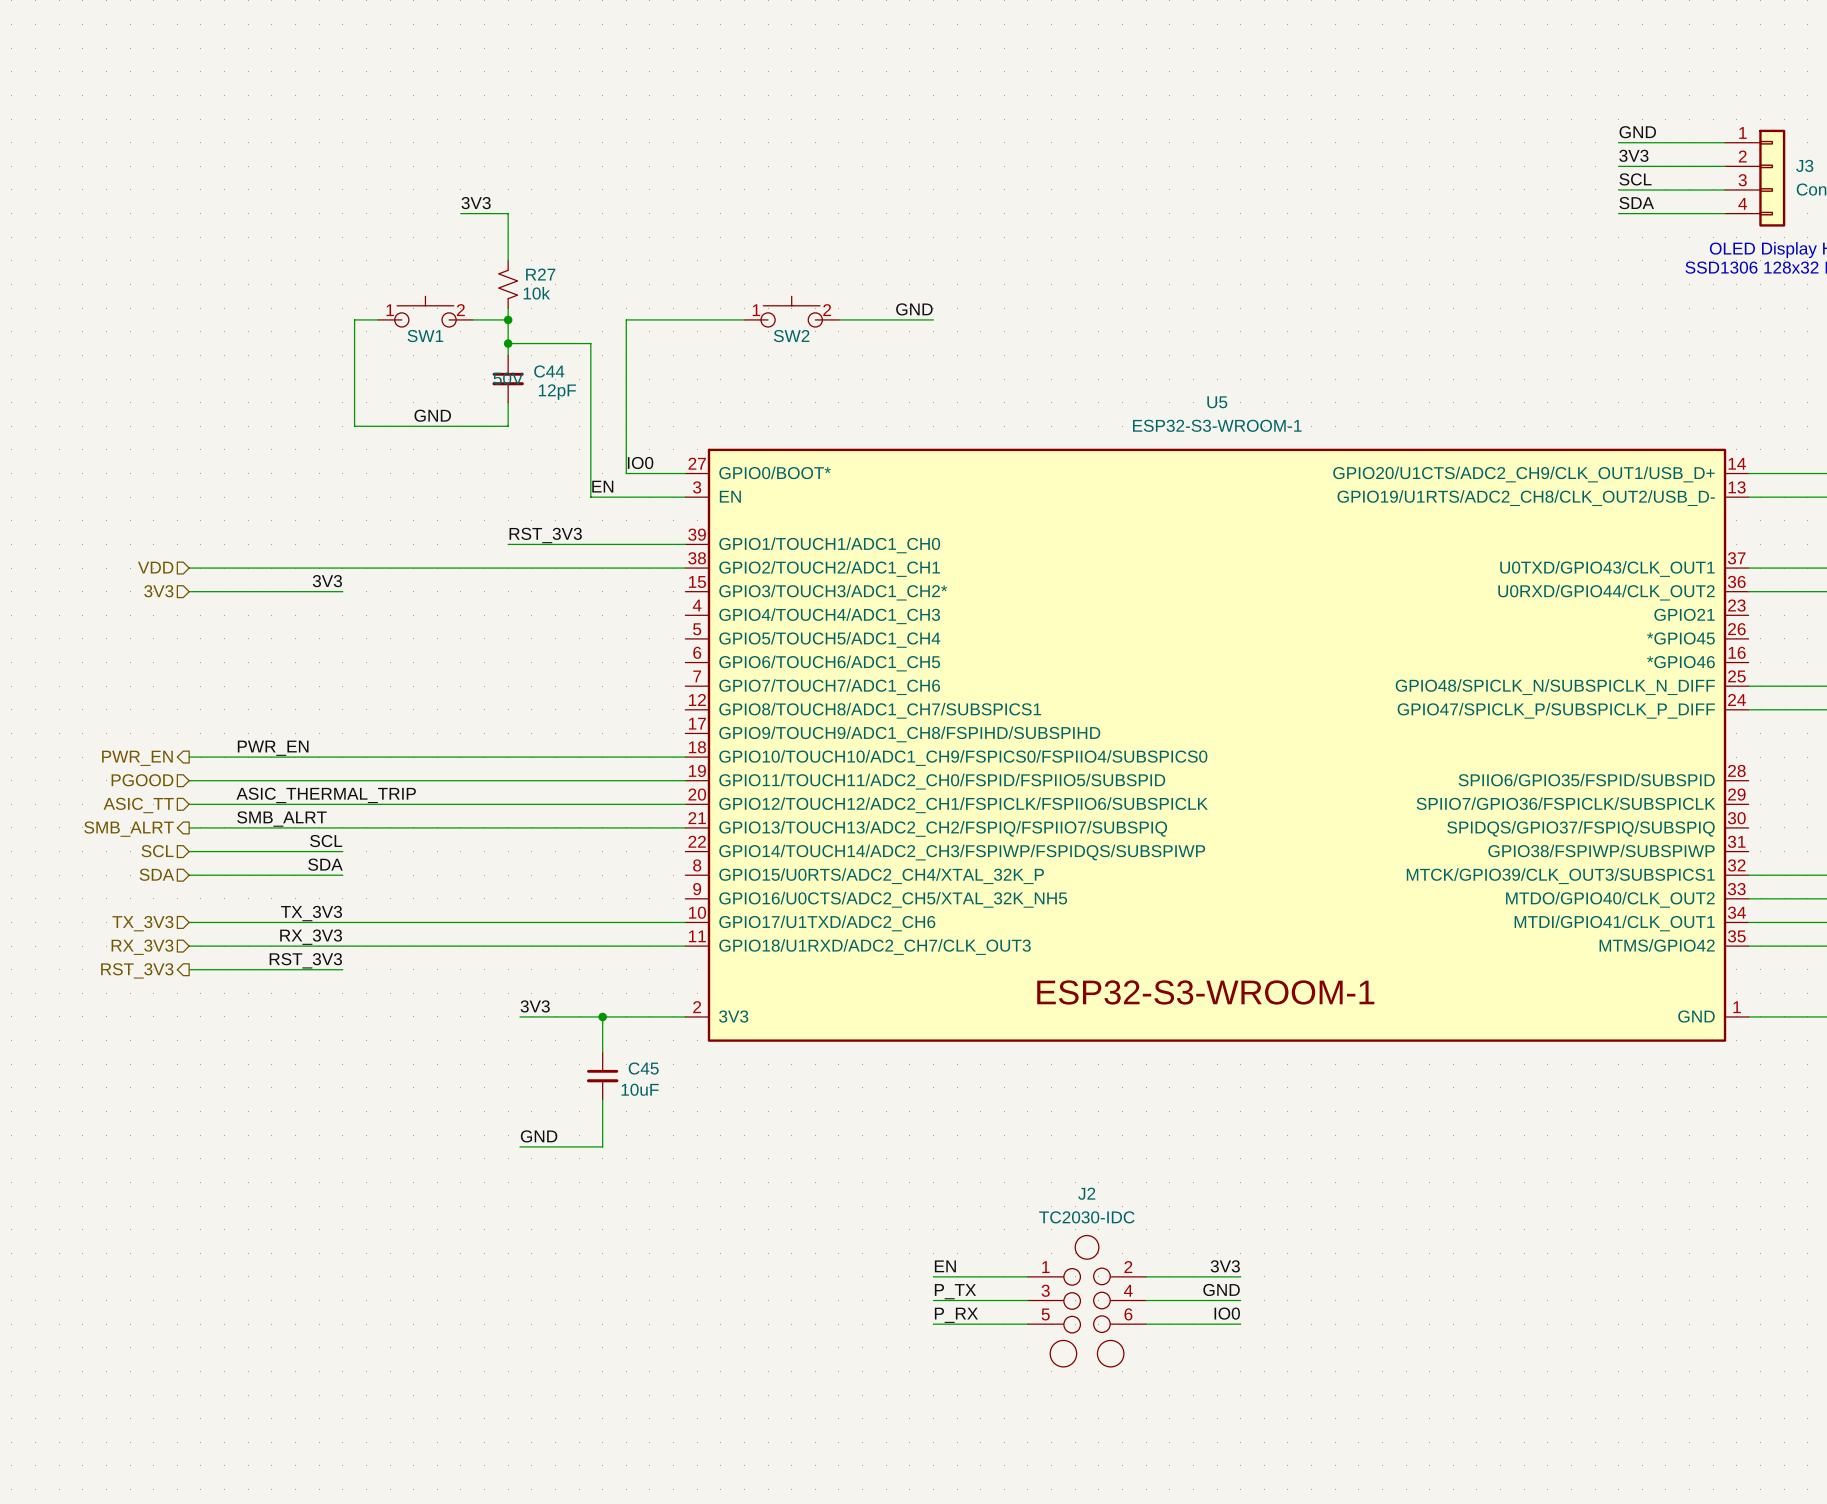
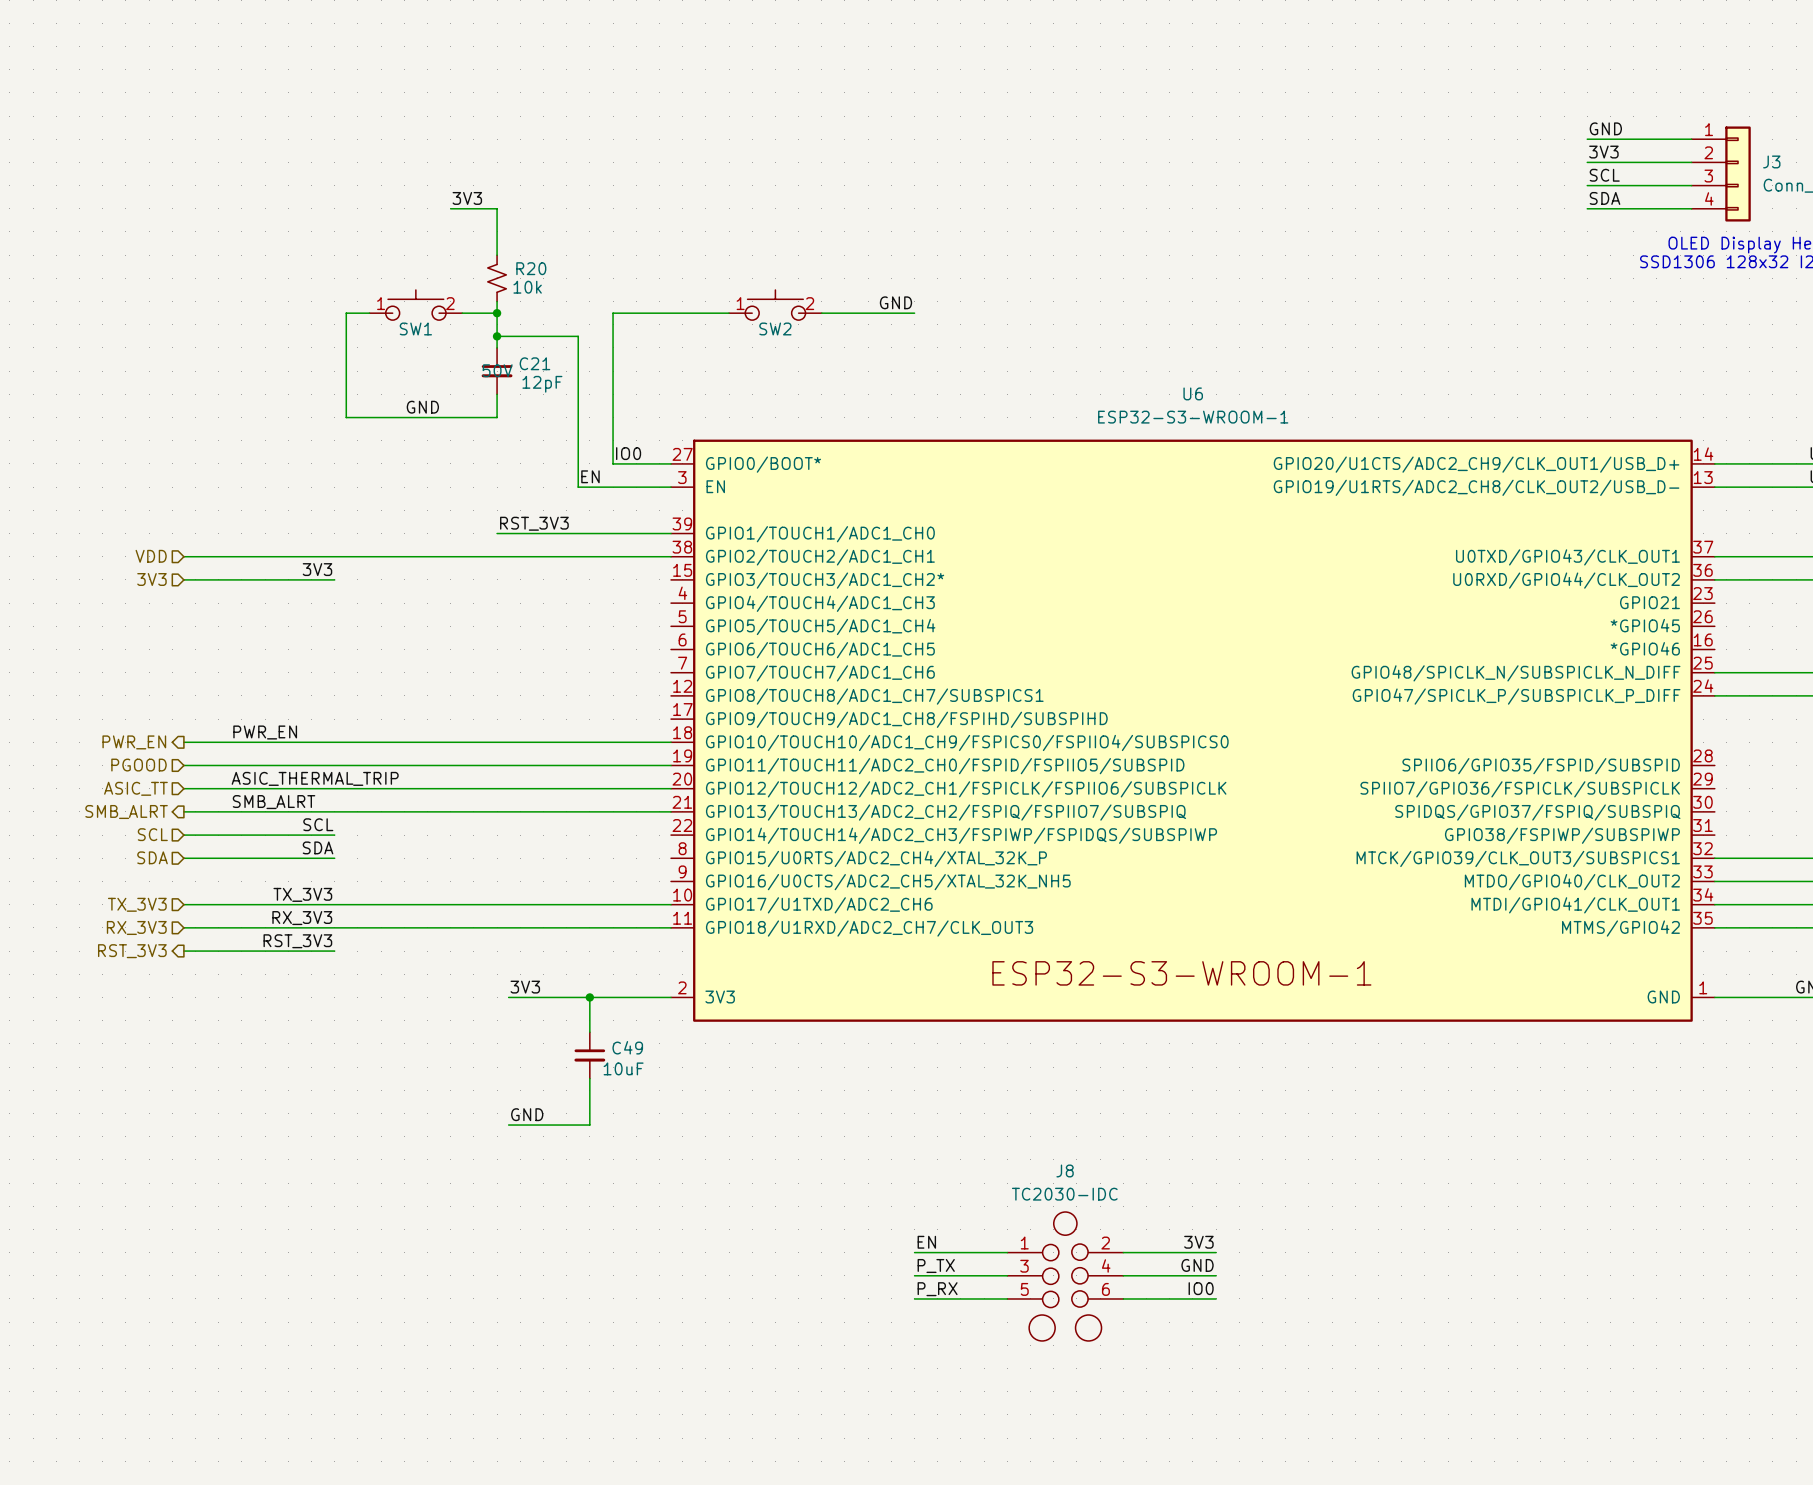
R27 name: R27 (540, 274) -> R20 (531, 268)
C44 name: C44 (549, 371) -> C21 (534, 363)
U5 name: U5 (1217, 402) -> U6 (1193, 393)
C45 name: C45 (643, 1068) -> C49 (627, 1047)
J2 name: J2 (1086, 1193) -> J8 (1065, 1170)

